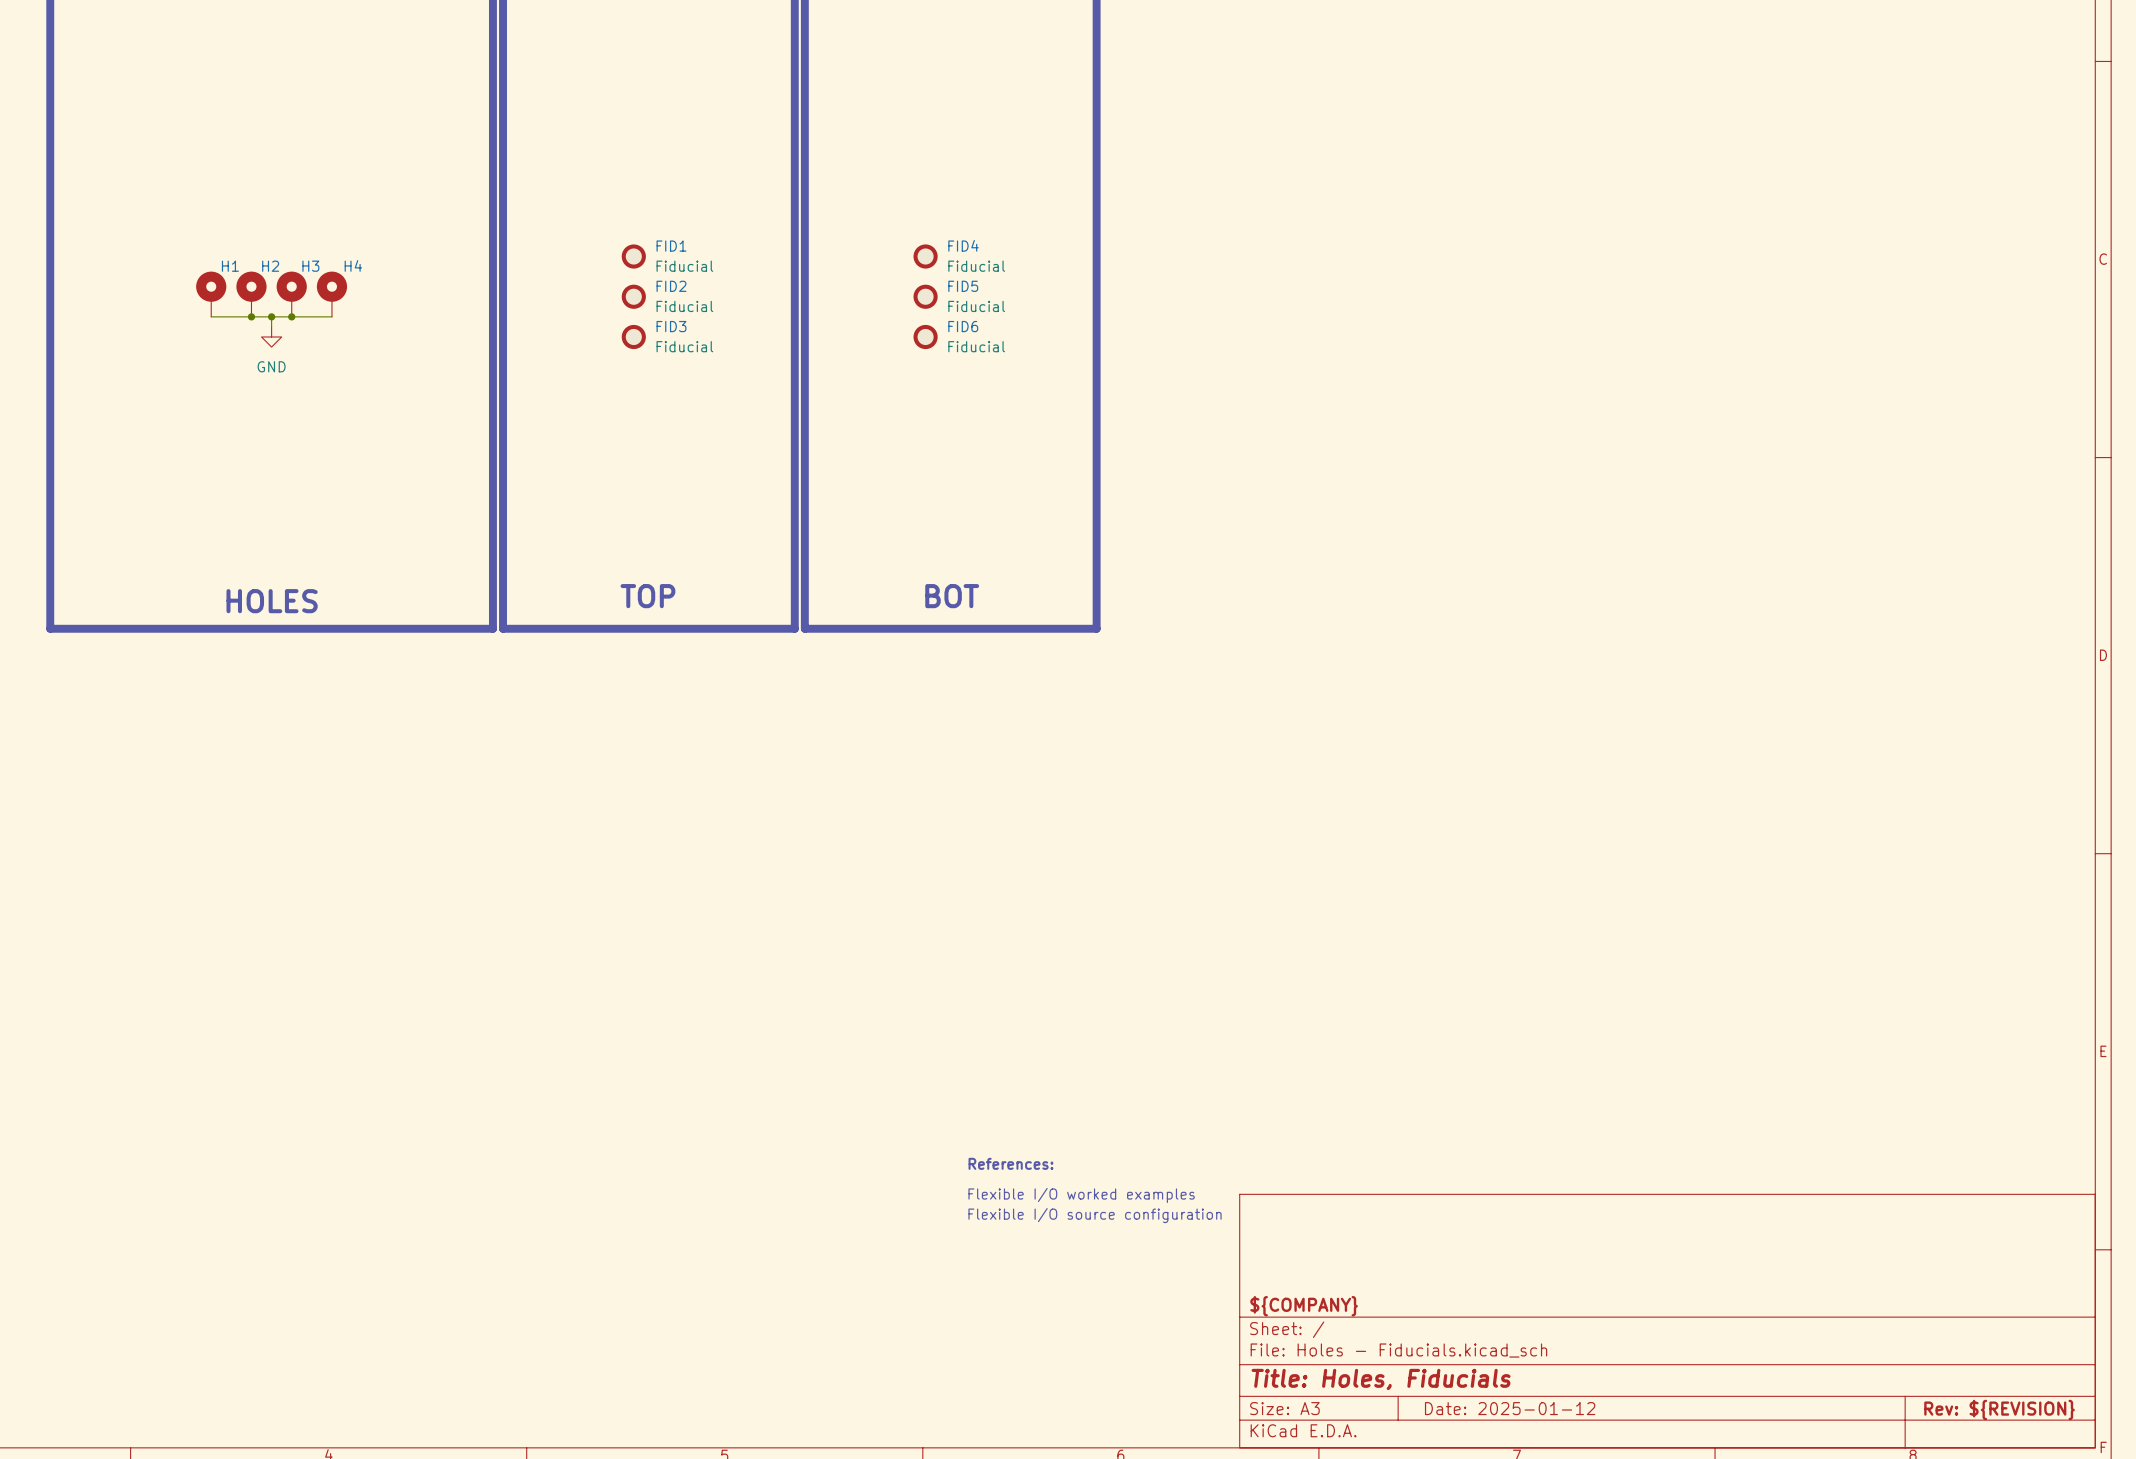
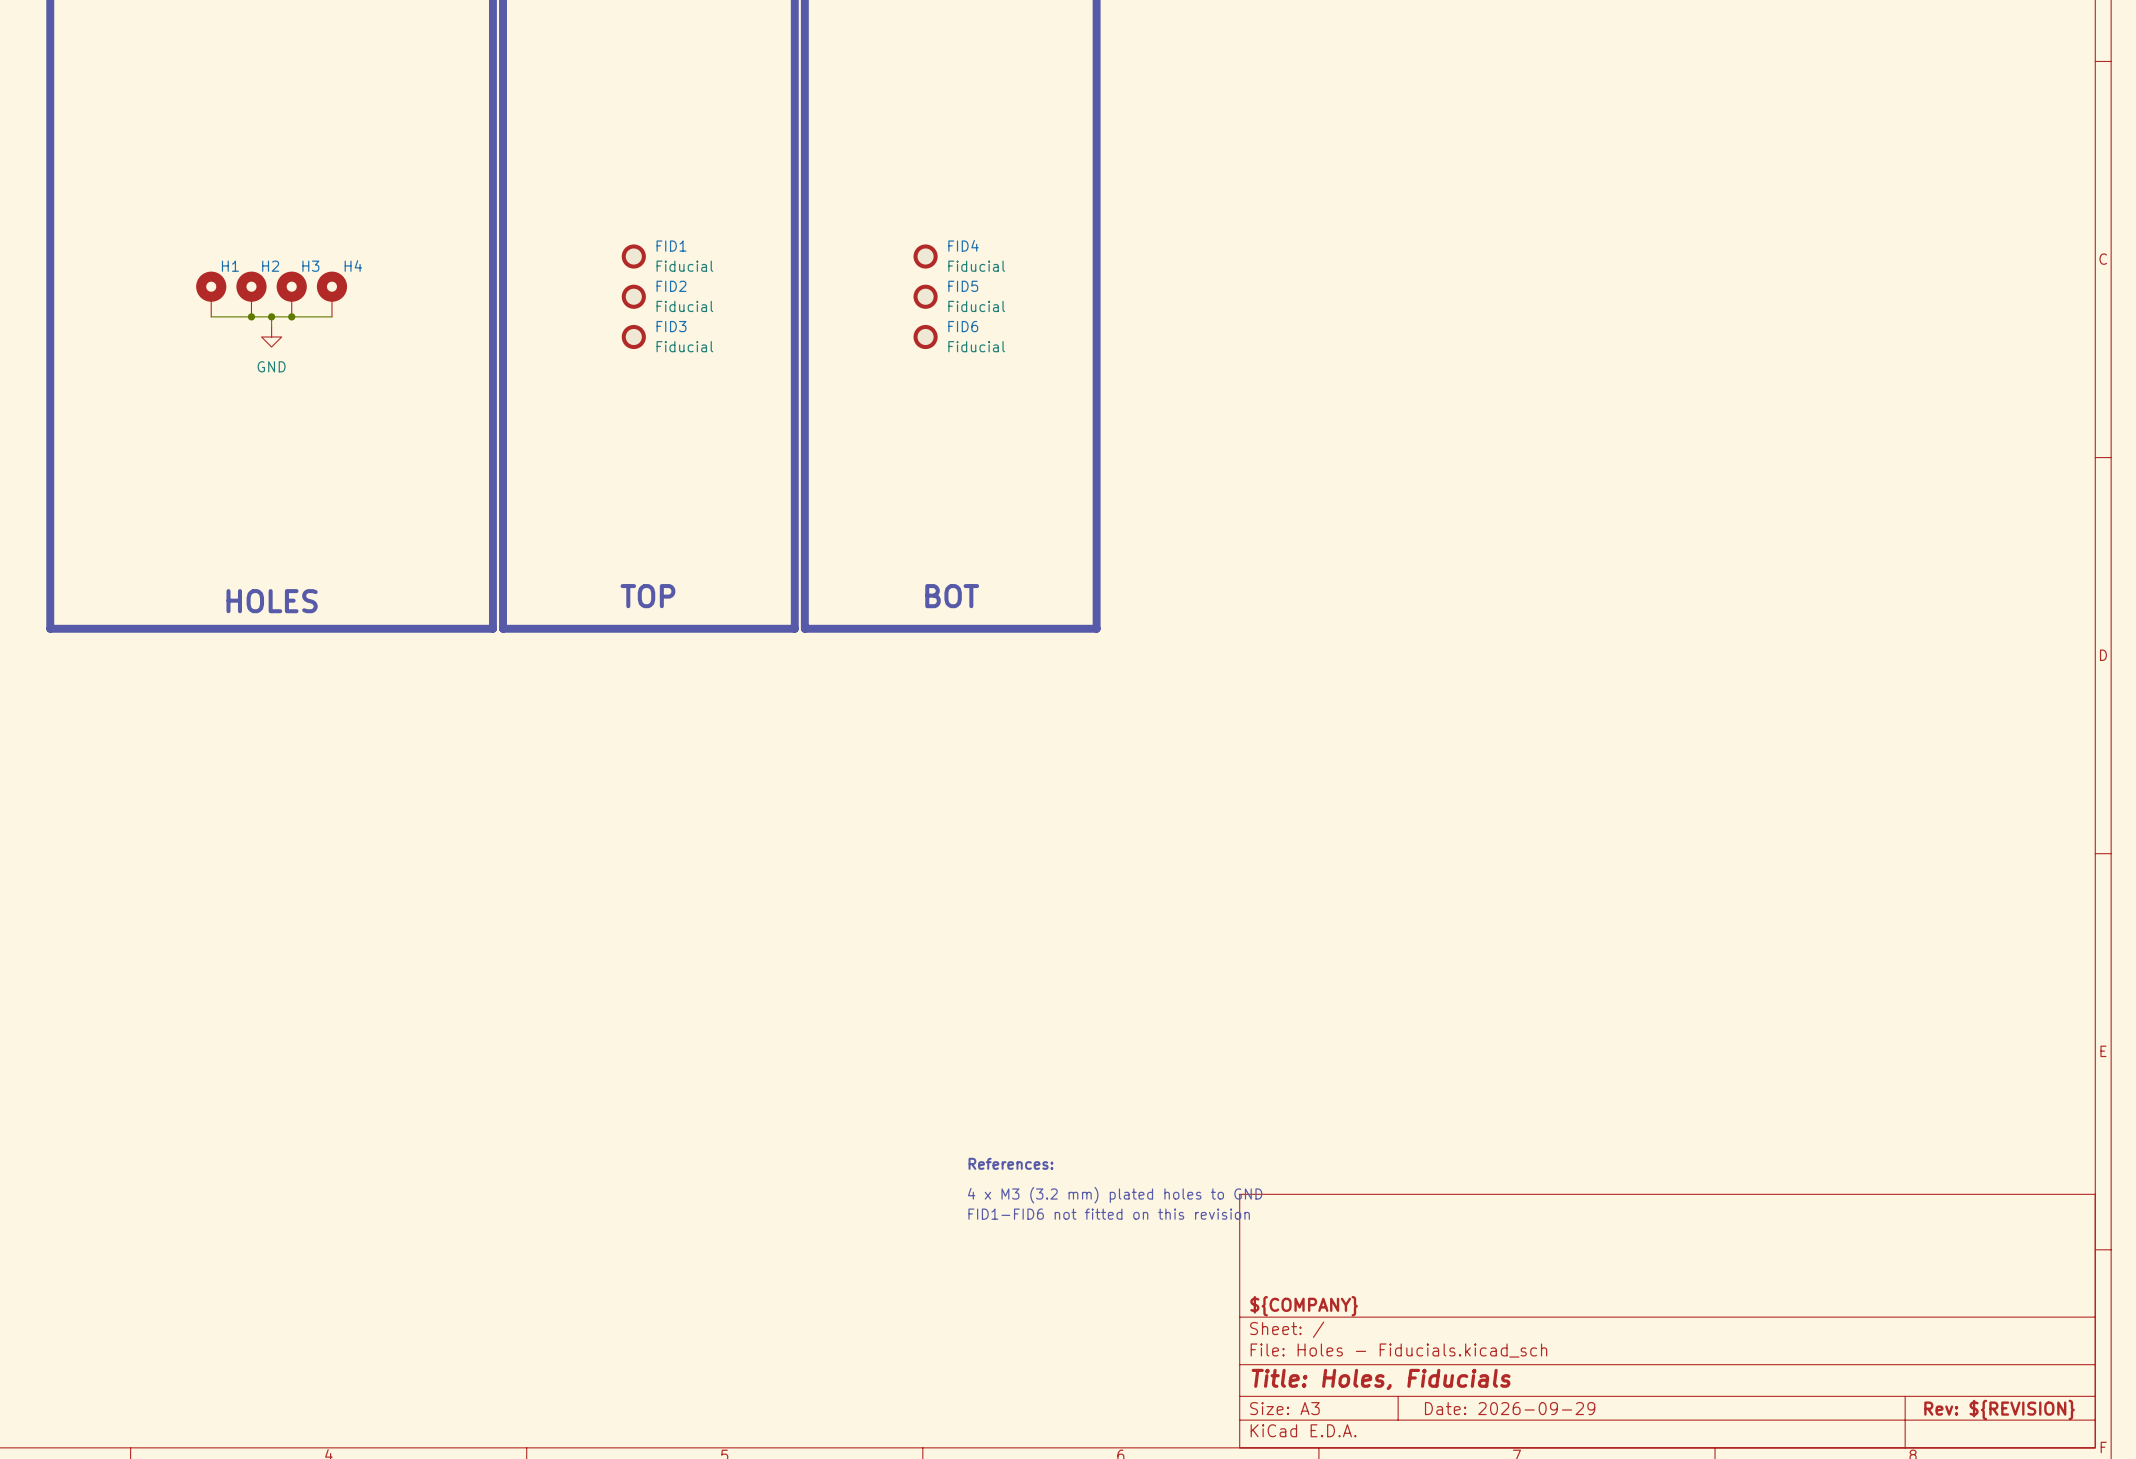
text: Flexible I/O worked examples (1081, 1195) -> 4 x M3 (3.2 mm) plated holes to GND (1115, 1195)
text: Flexible I/O source configuration (1095, 1215) -> FID1-FID6 not fitted on this revision (1109, 1214)
title block: Date: 2025-01-12 (1510, 1408) -> Date: 2026-09-29 (1510, 1408)

